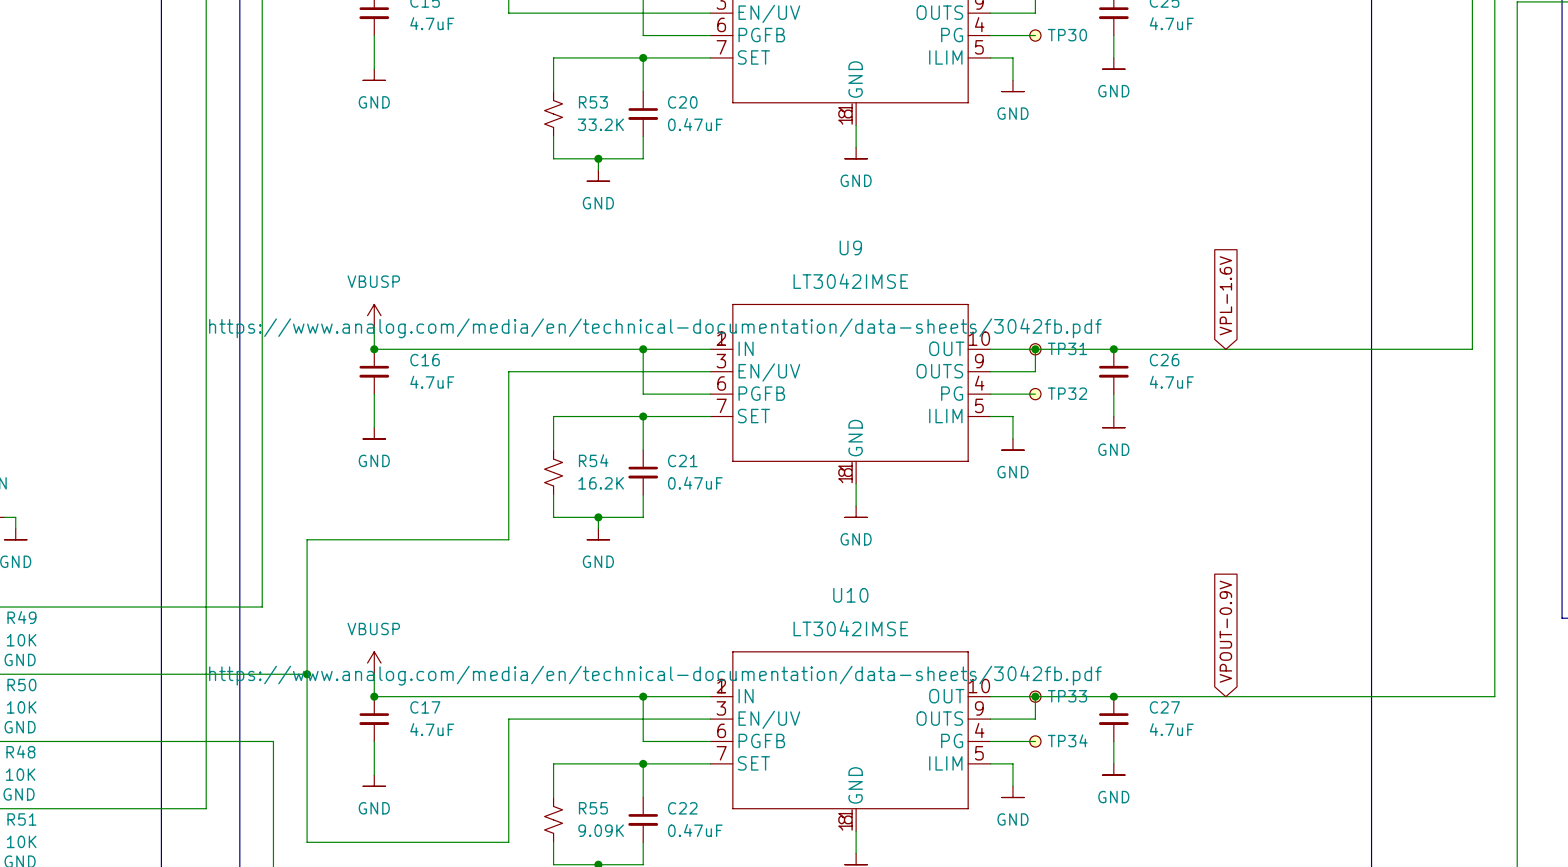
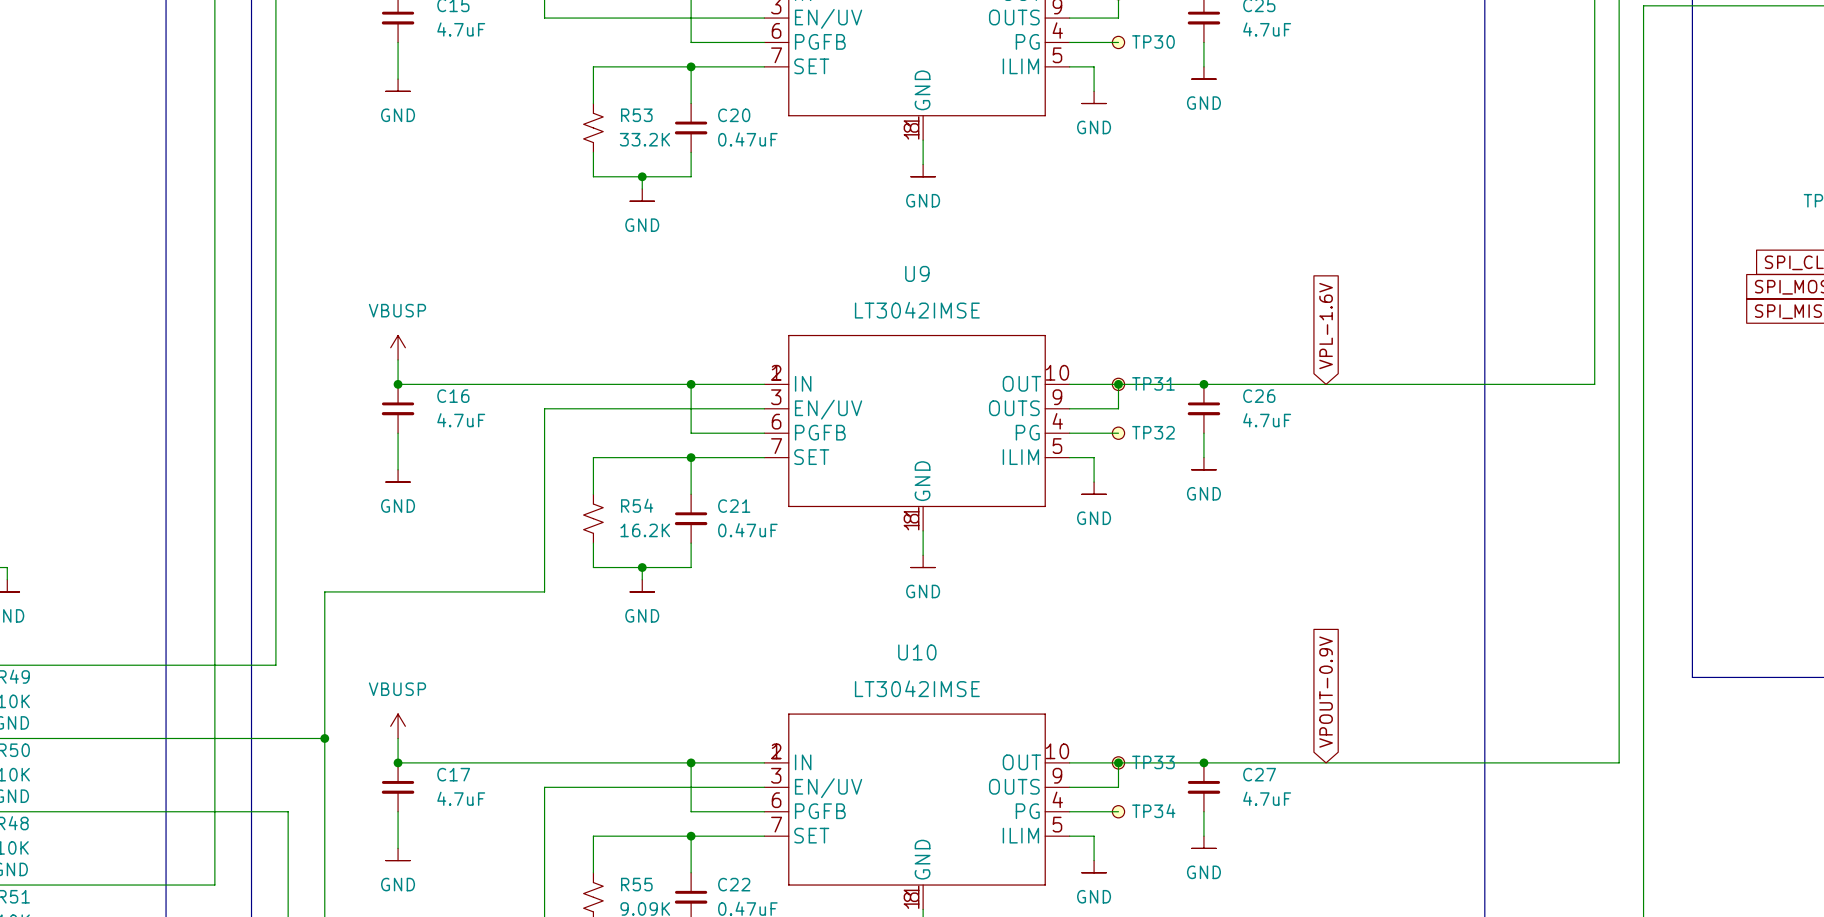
U9 text: https://www.analog.com/media/en/technical-documentation/data-sheets/3042fb.pdf (655, 328) -> none
U10 text: https://www.analog.com/media/en/technical-documentation/data-sheets/3042fb.pdf (655, 675) -> none

